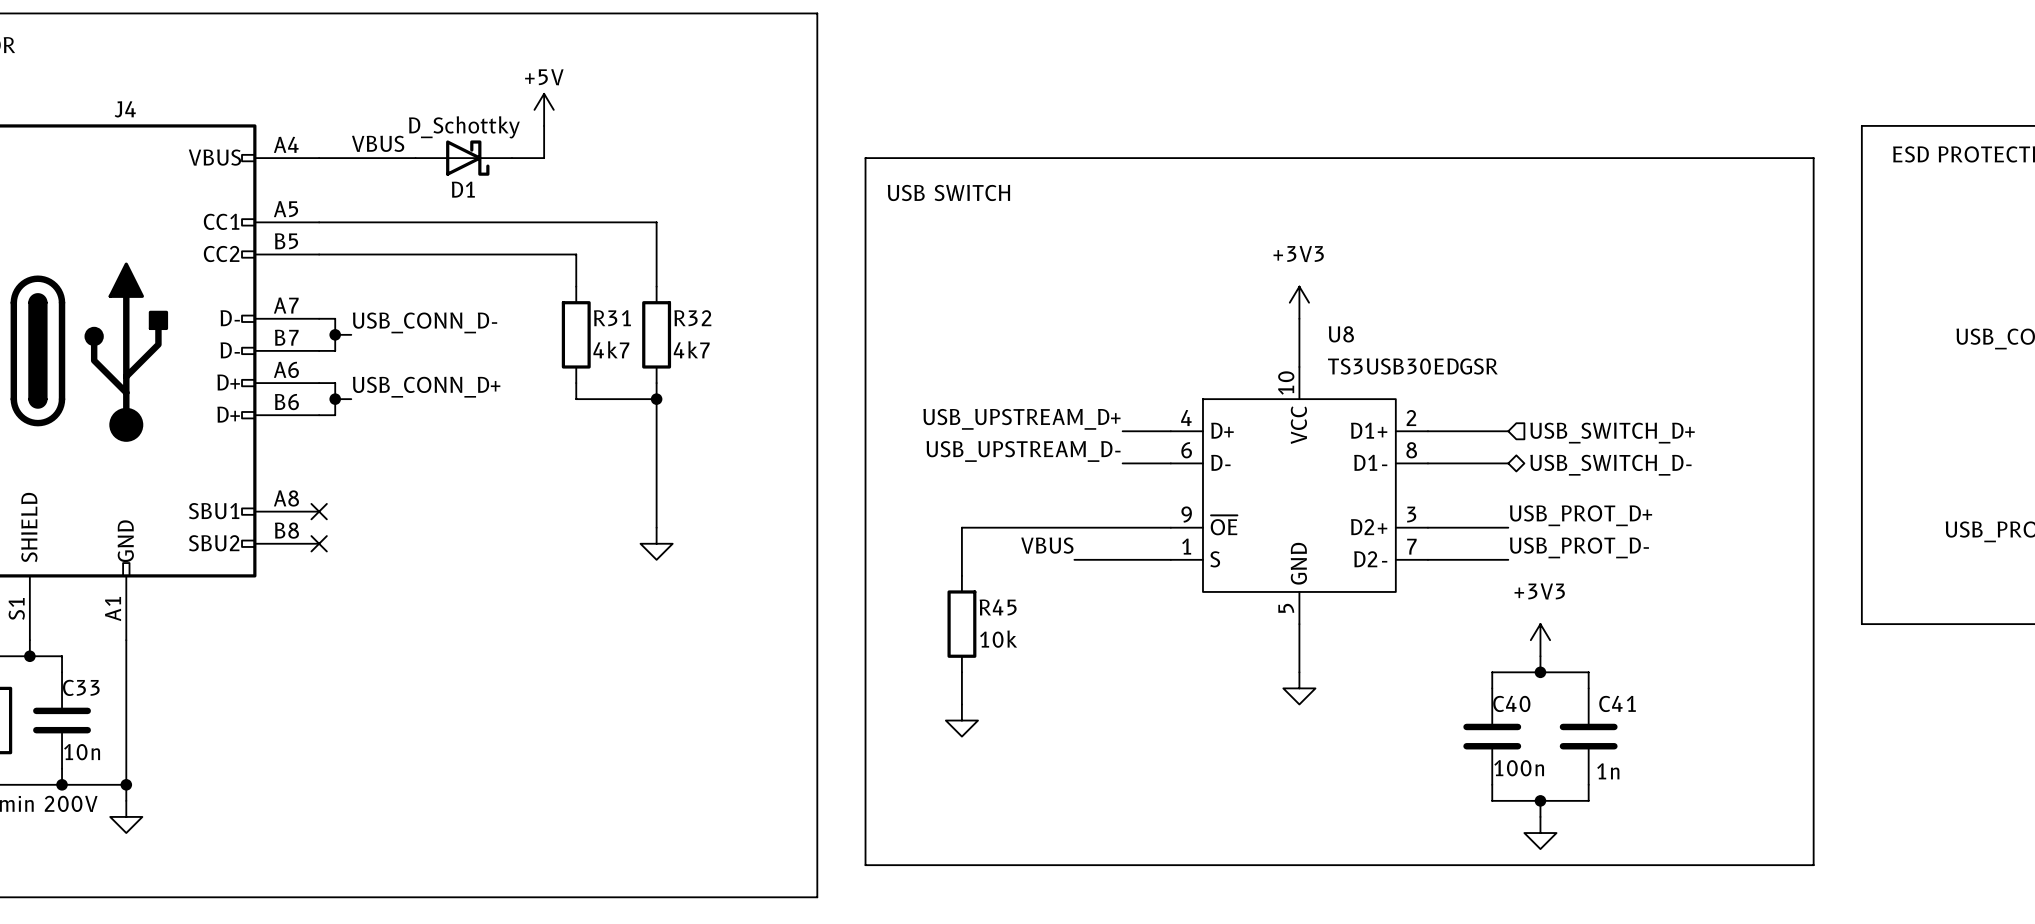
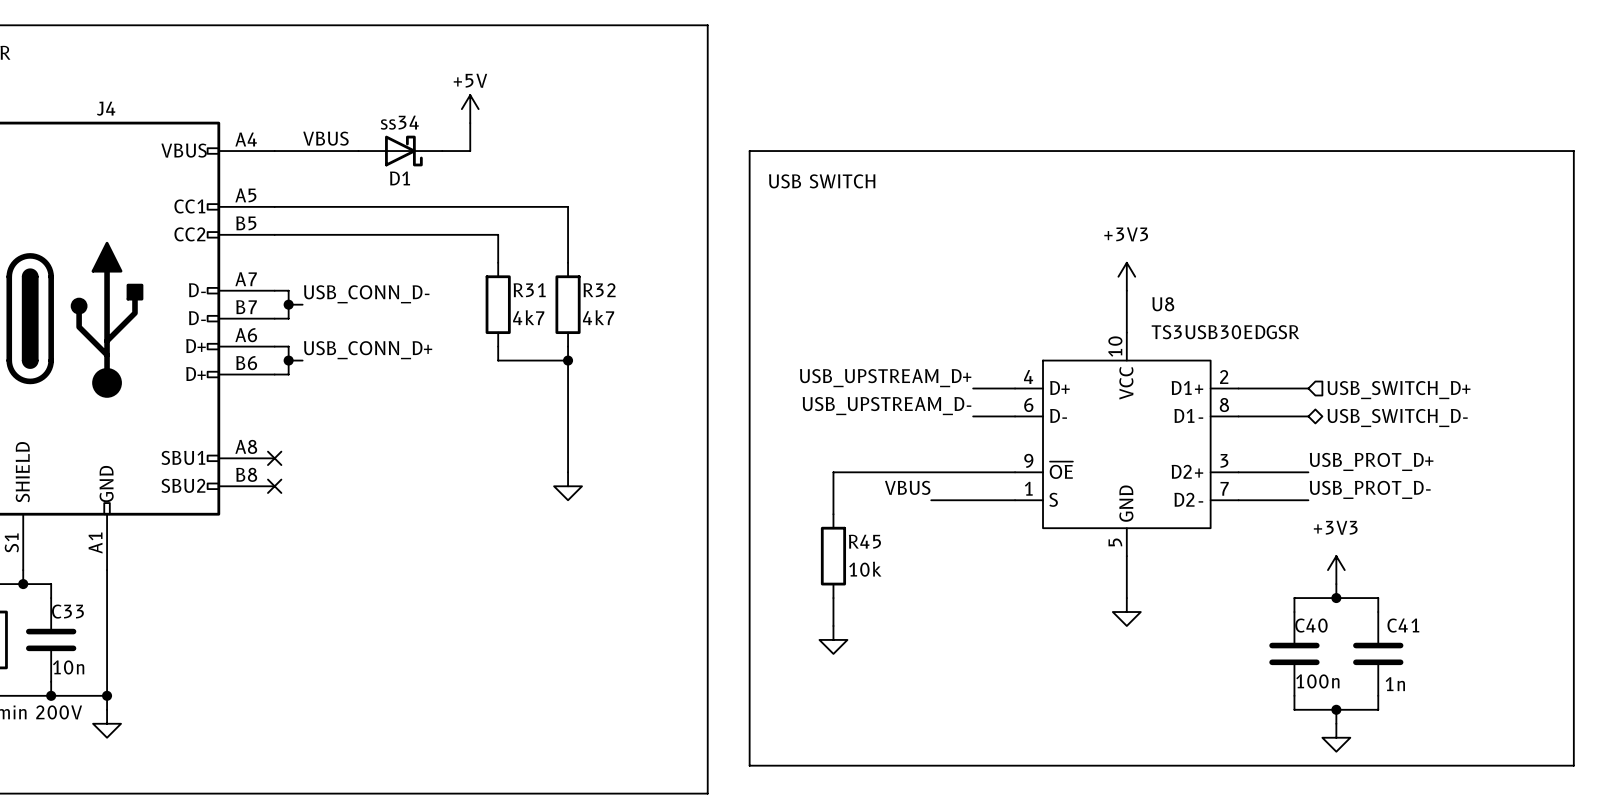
D1 value: D_Schottky (464, 127) -> ss34 (399, 122)

